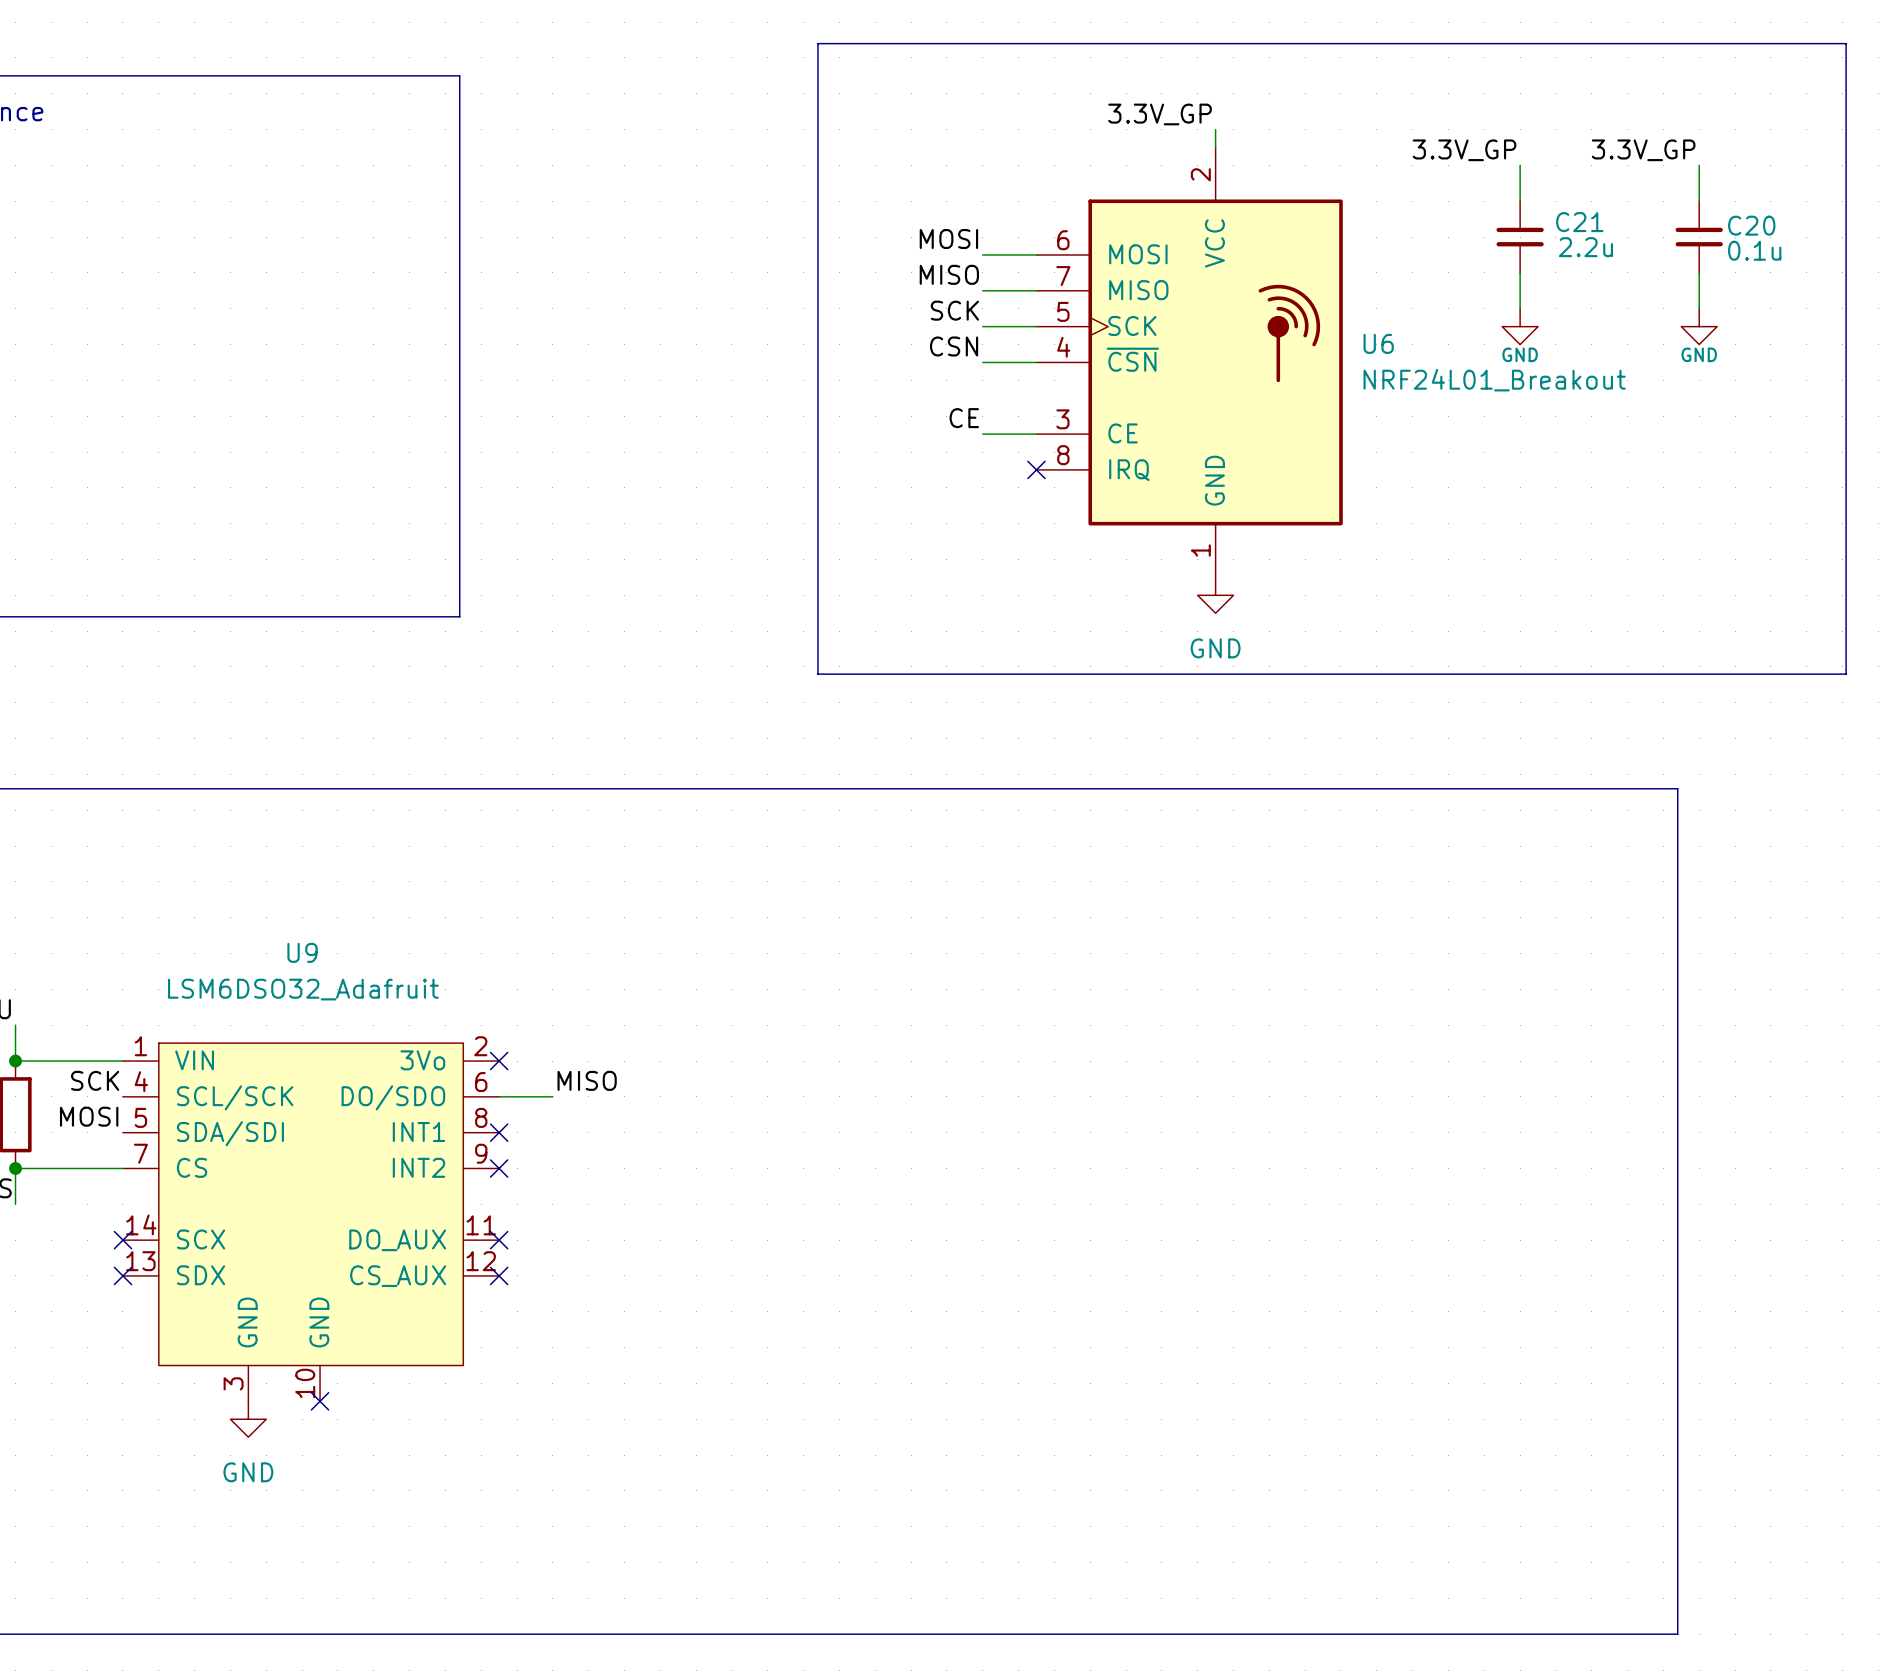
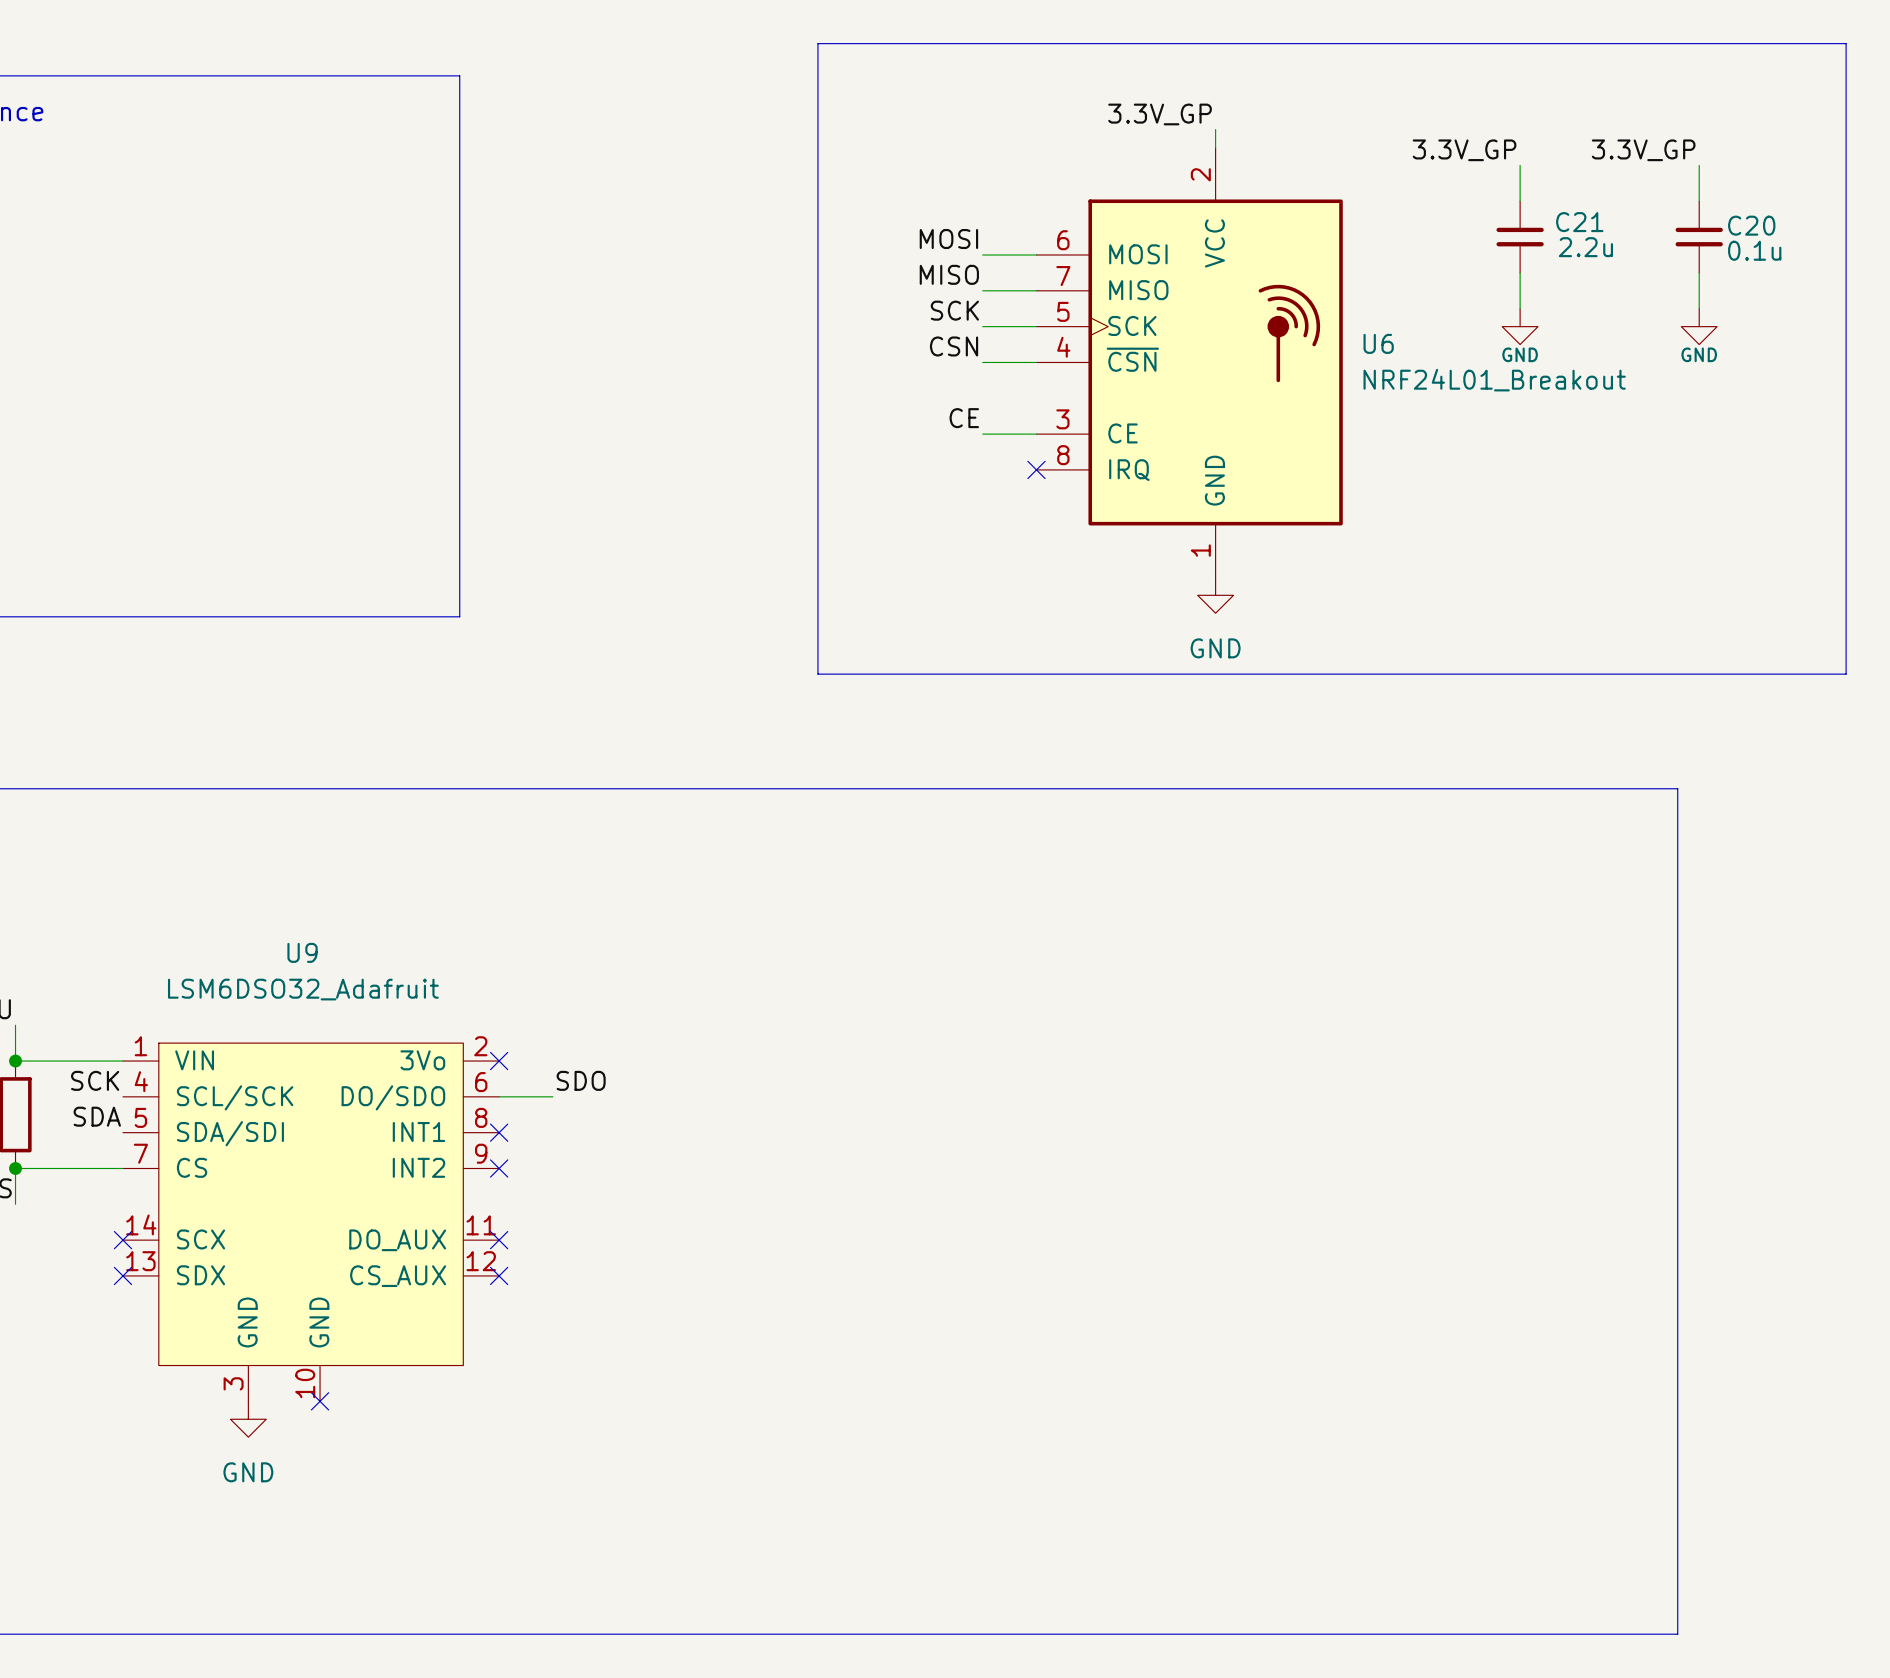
label: MISO (587, 1080) -> SDO (581, 1080)
label: MOSI (89, 1116) -> SDA (97, 1116)

